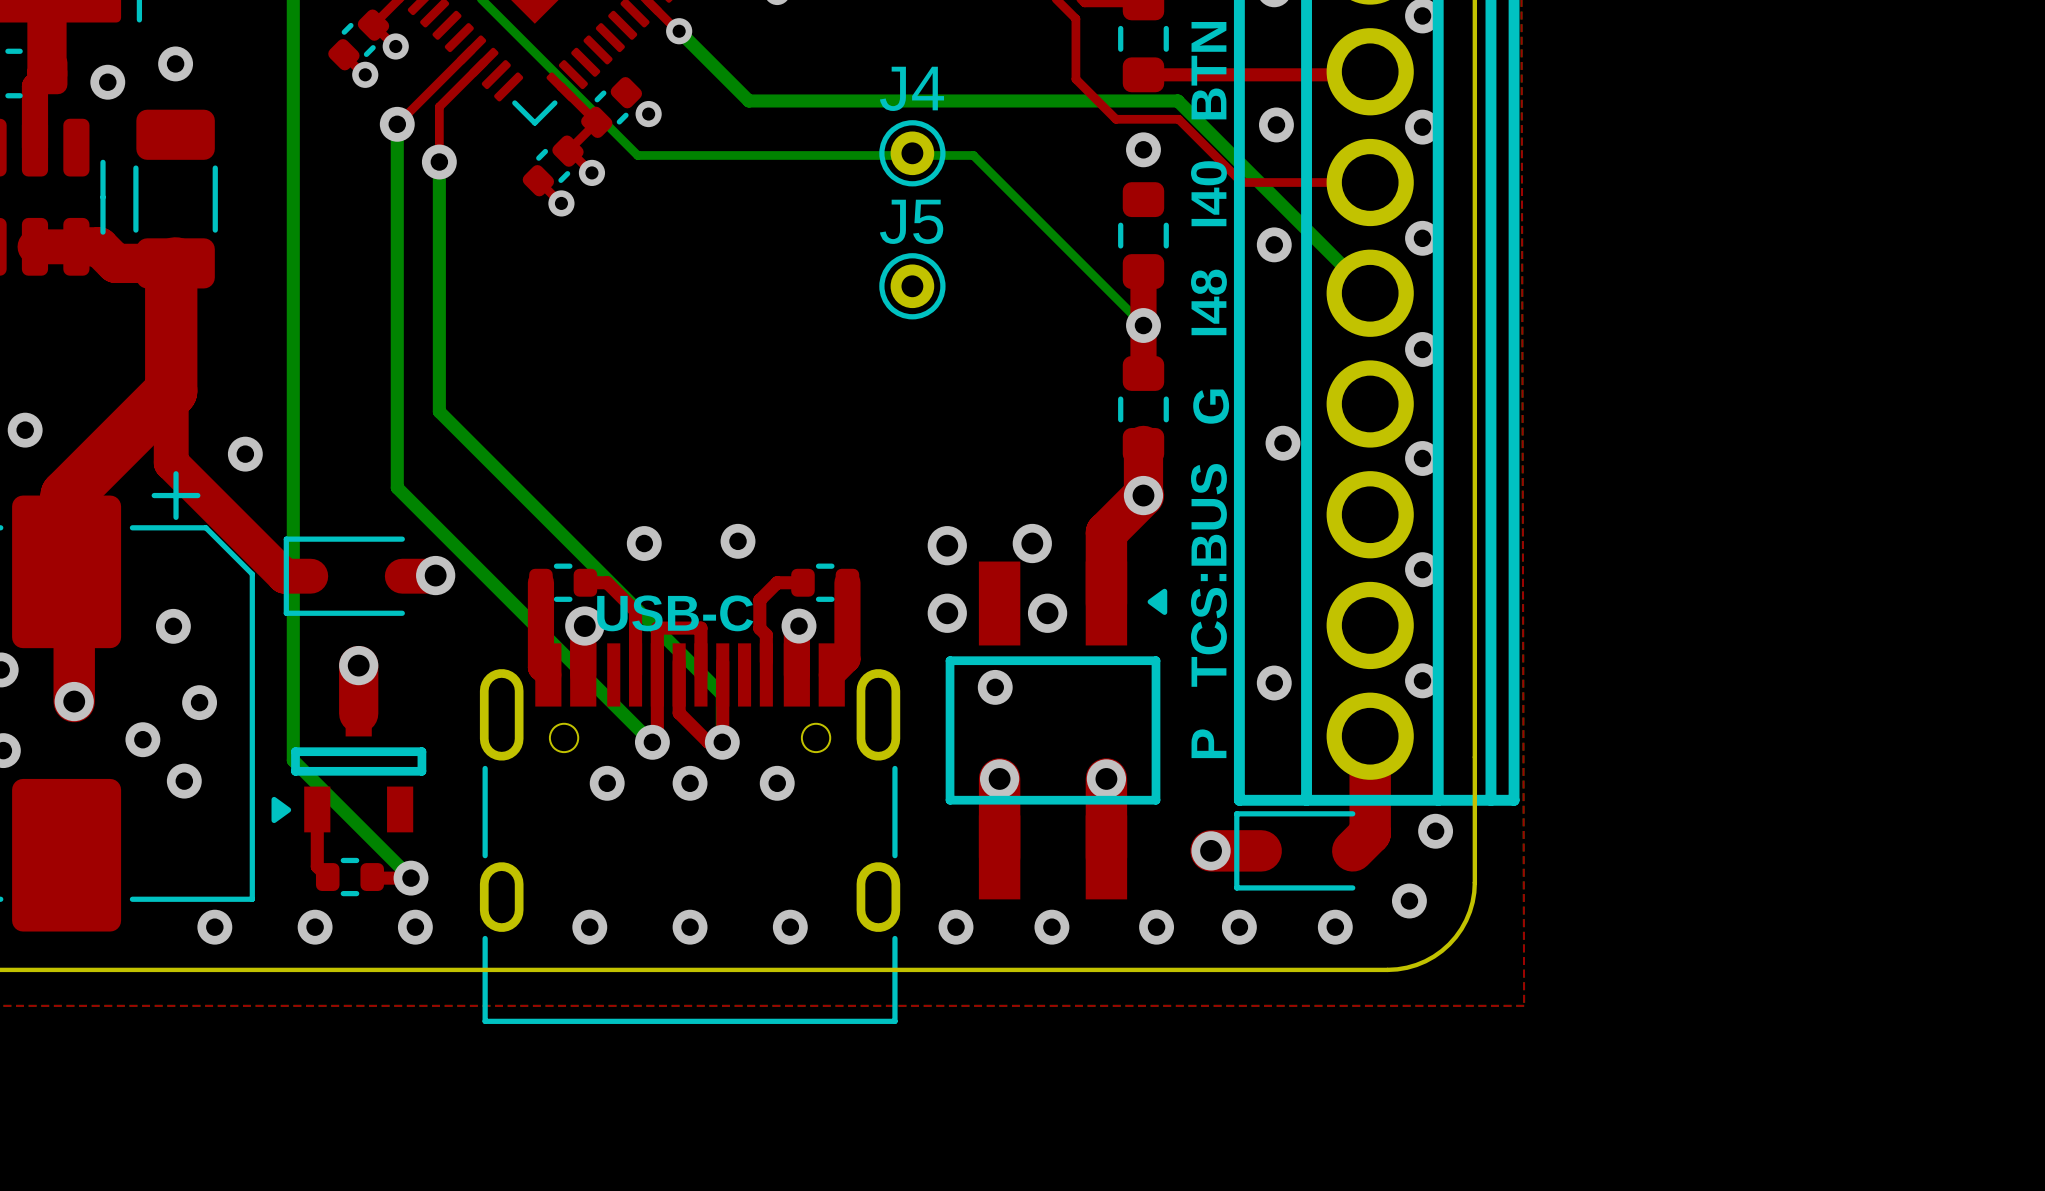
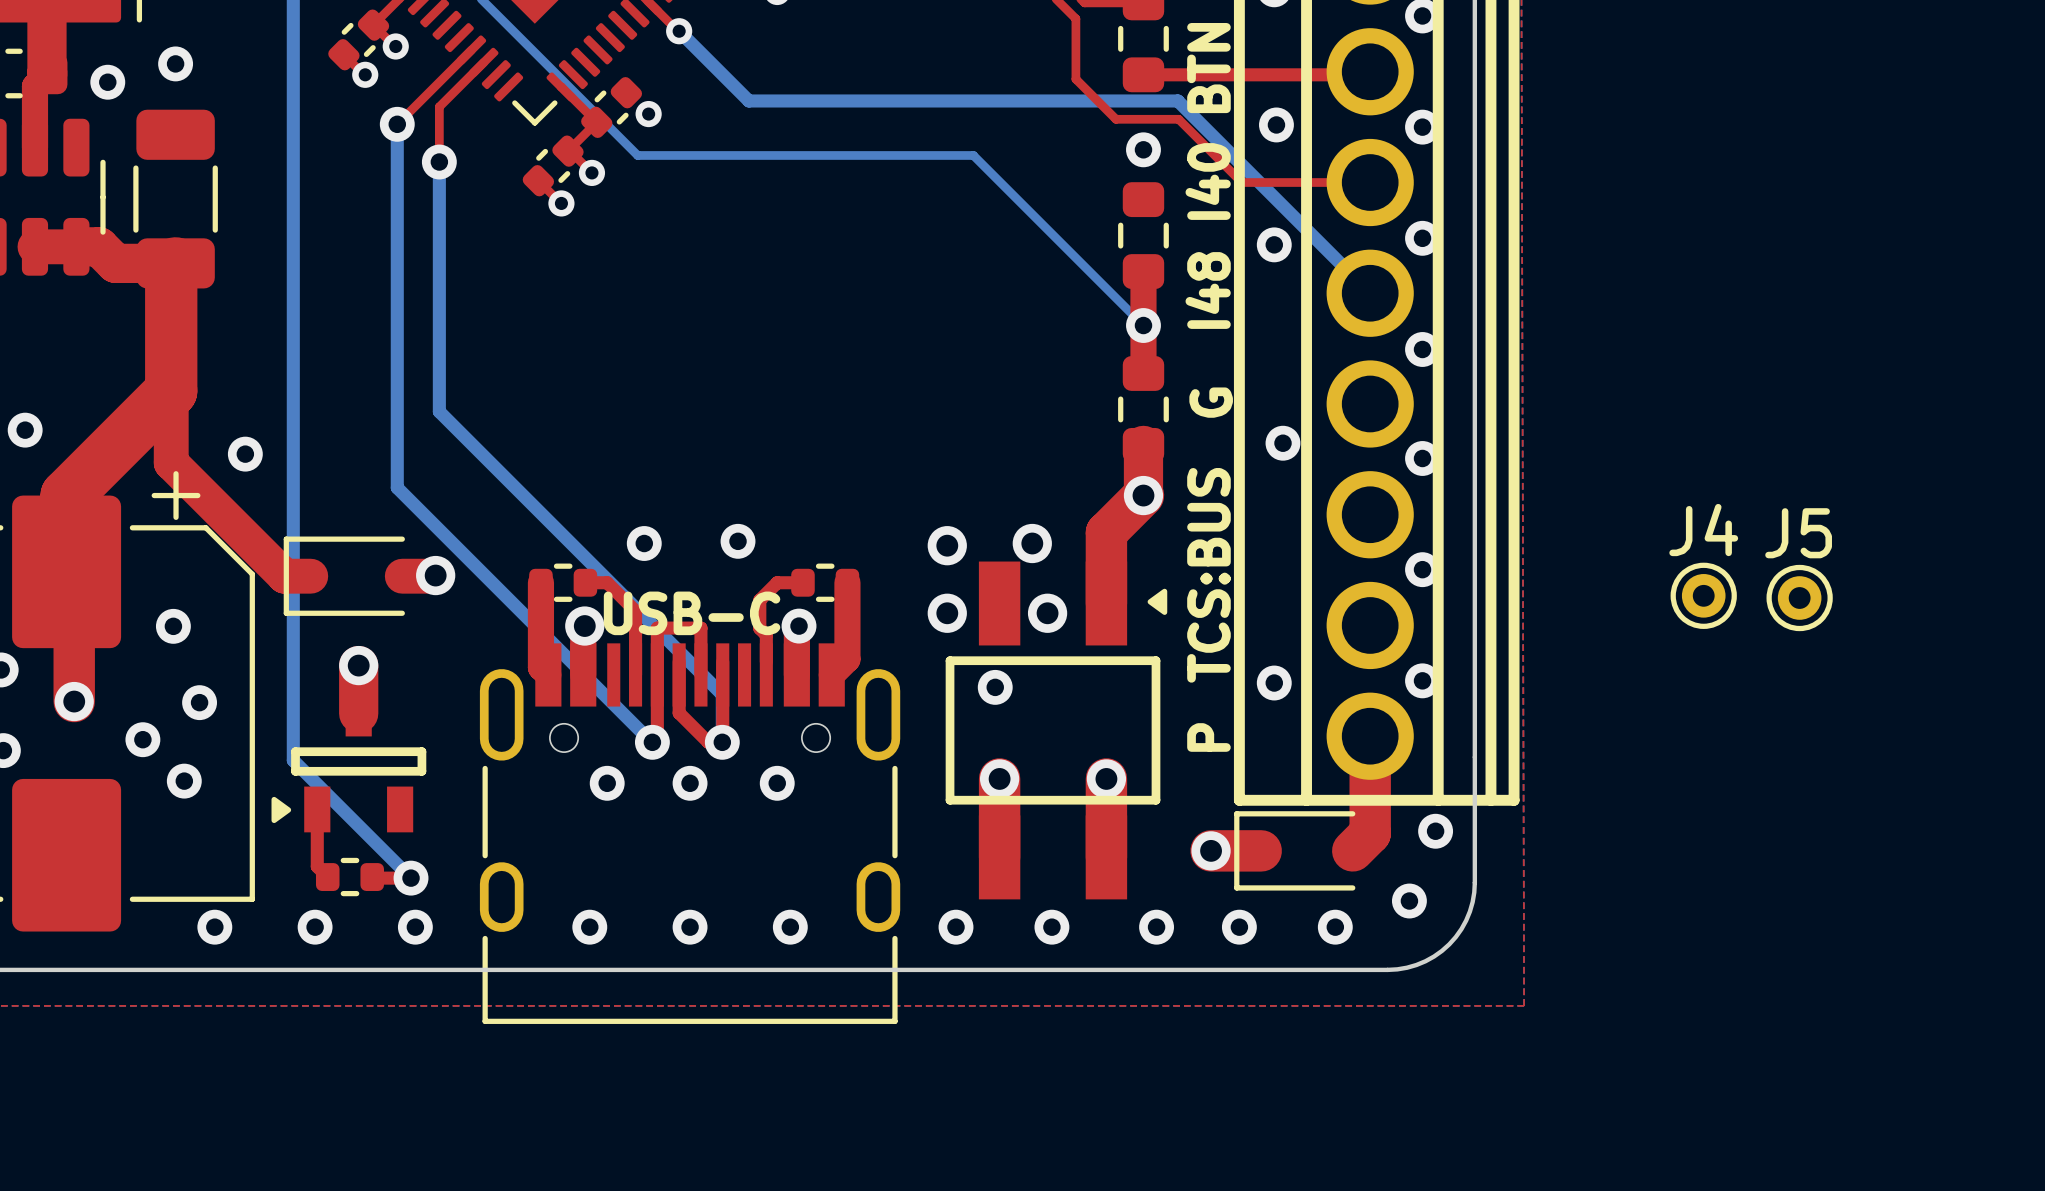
J4 position: (912, 153) -> (1703, 595)
J5 position: (912, 286) -> (1799, 598)

